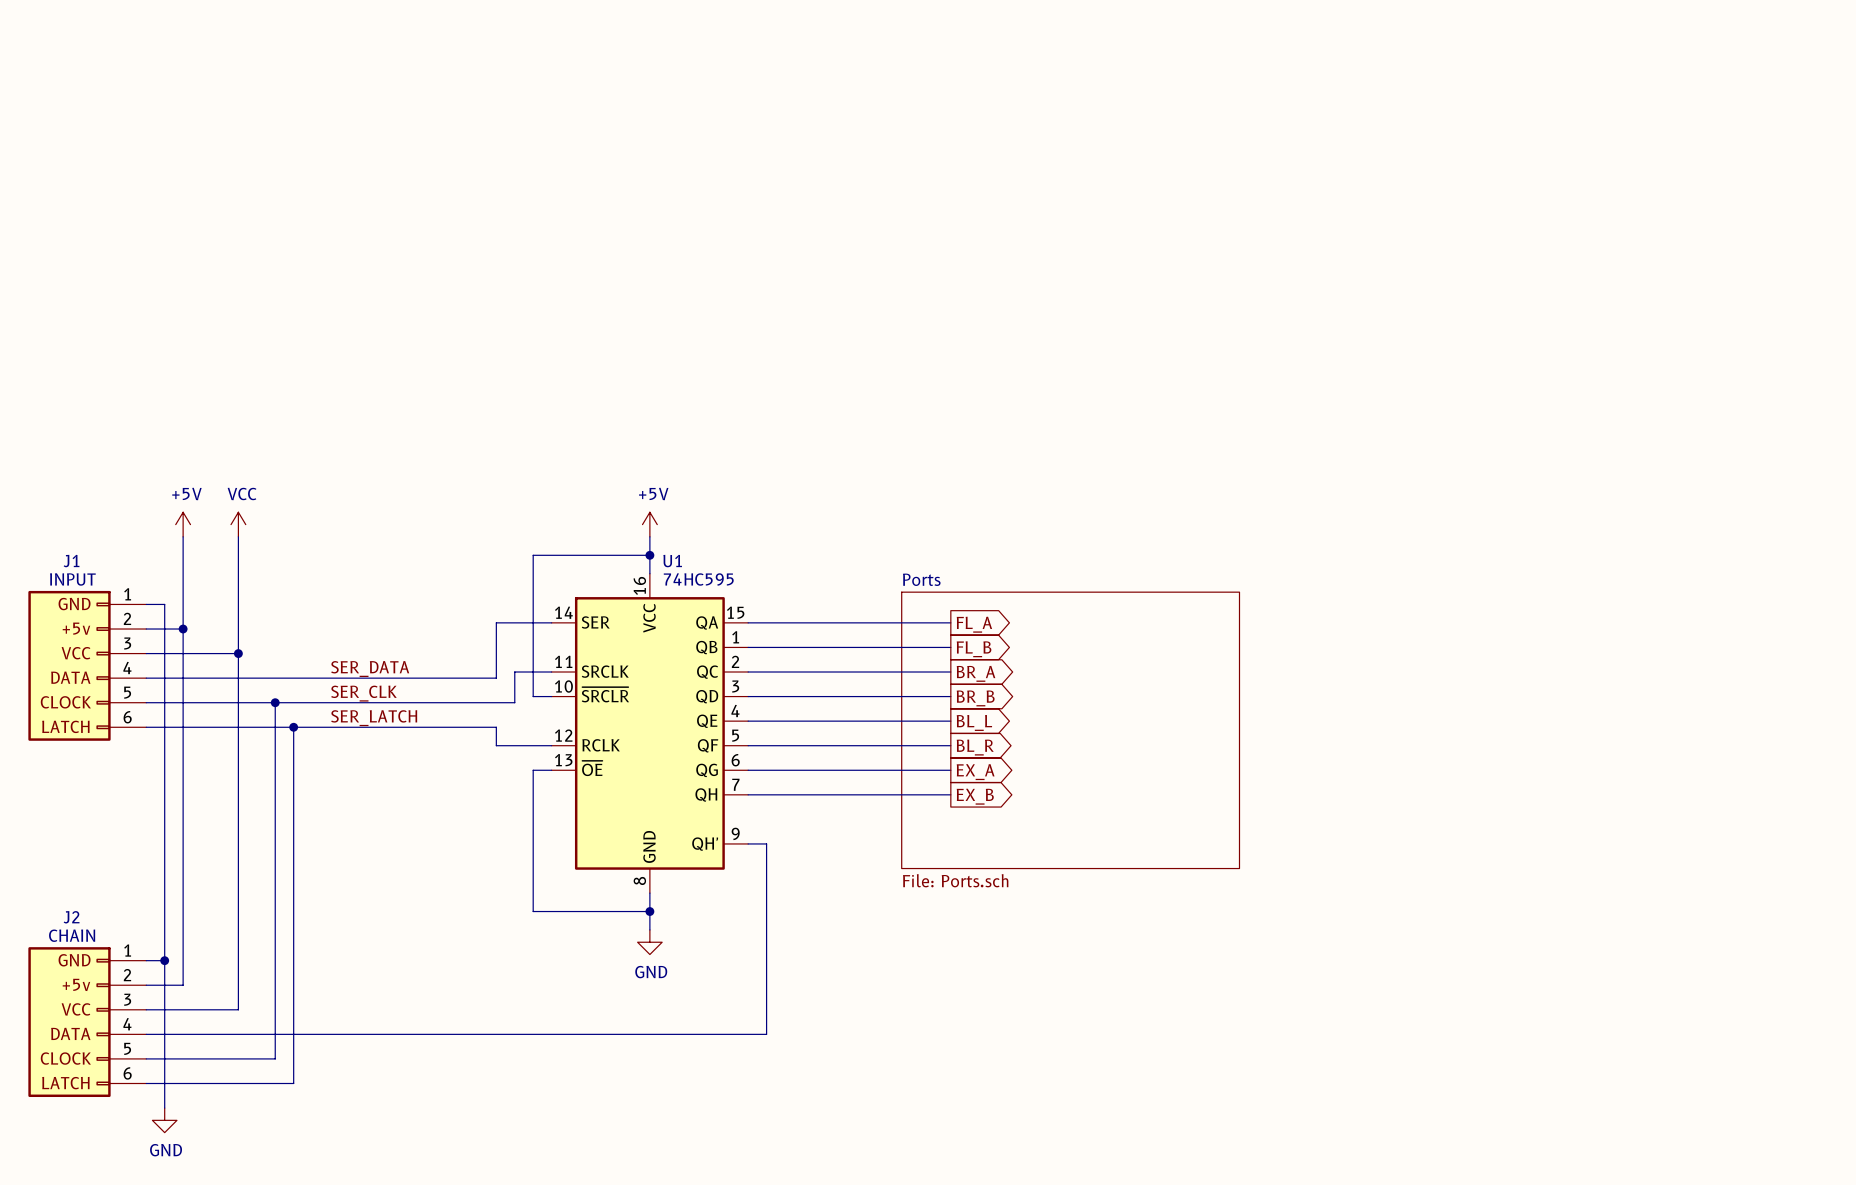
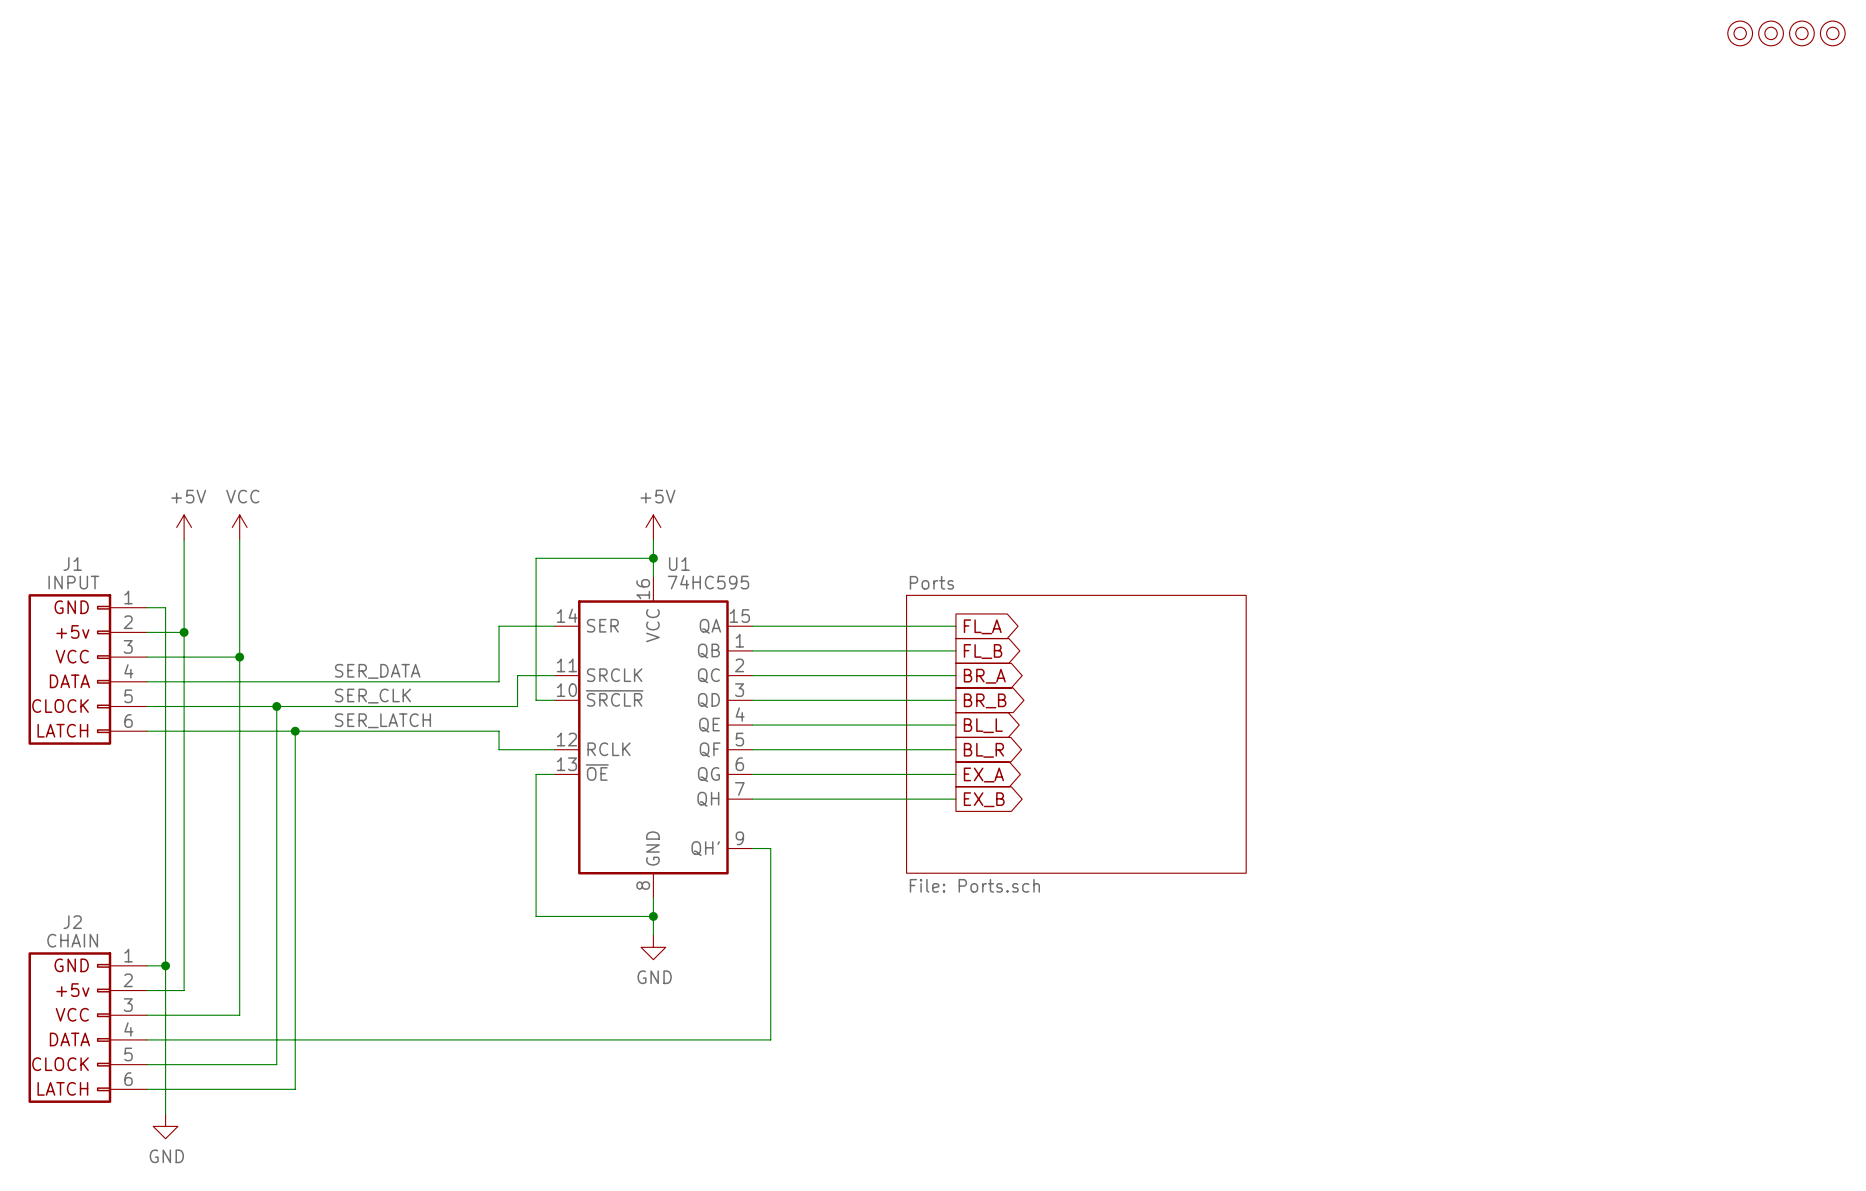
part: none -> (1740, 33)
part: none -> (1771, 33)
part: none -> (1801, 33)
part: none -> (1832, 33)

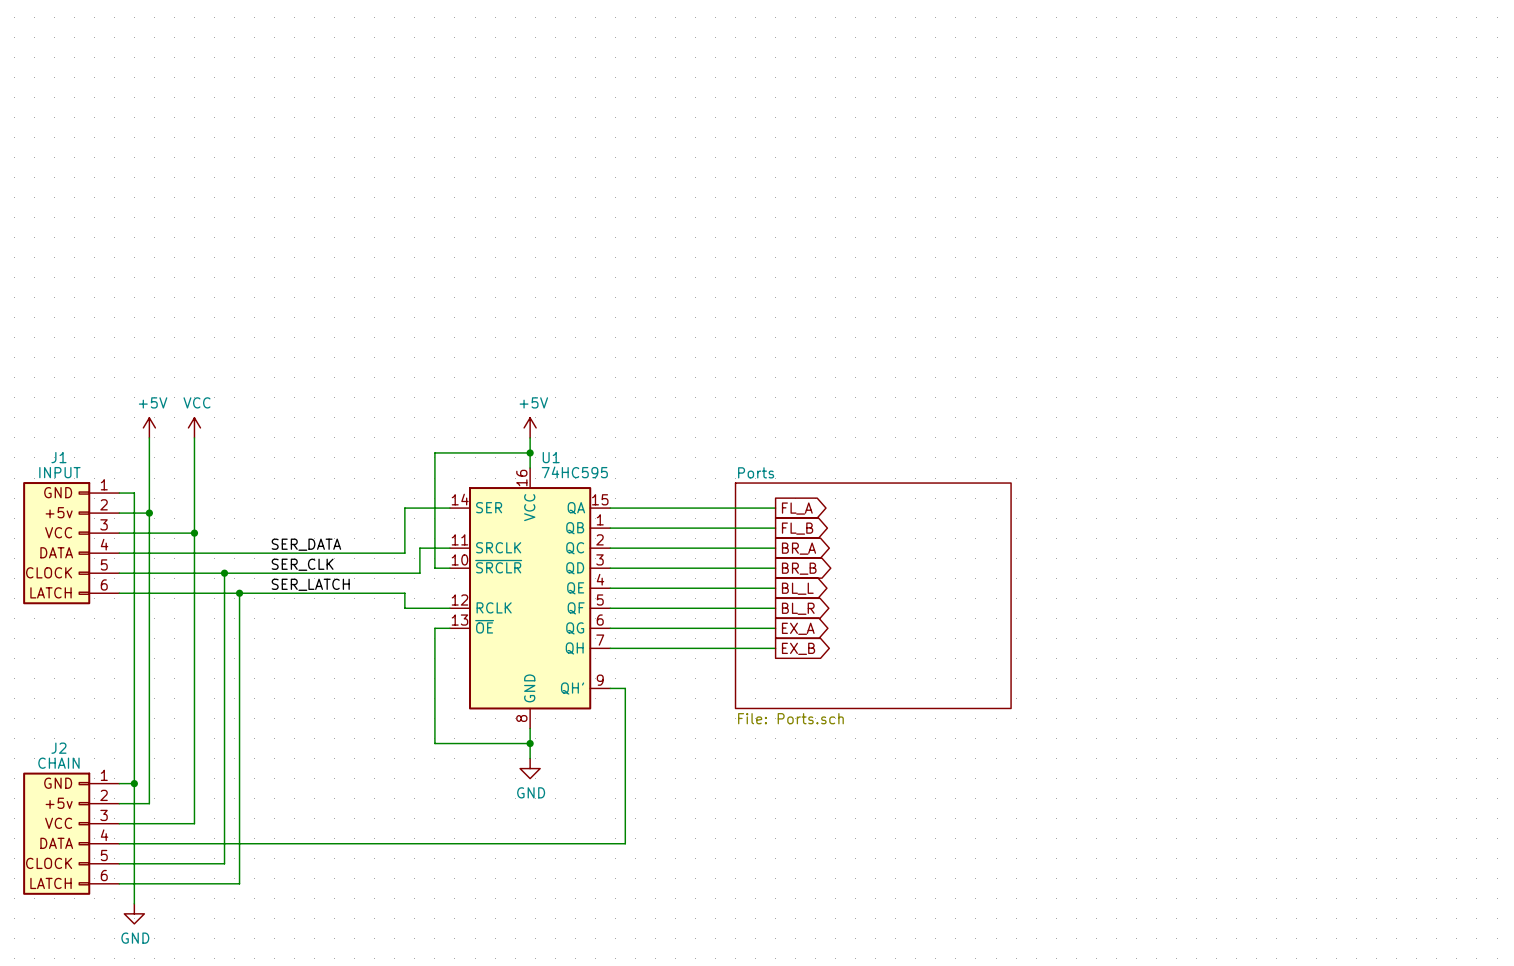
part: (1740, 33) -> none
part: (1771, 33) -> none
part: (1801, 33) -> none
part: (1832, 33) -> none

